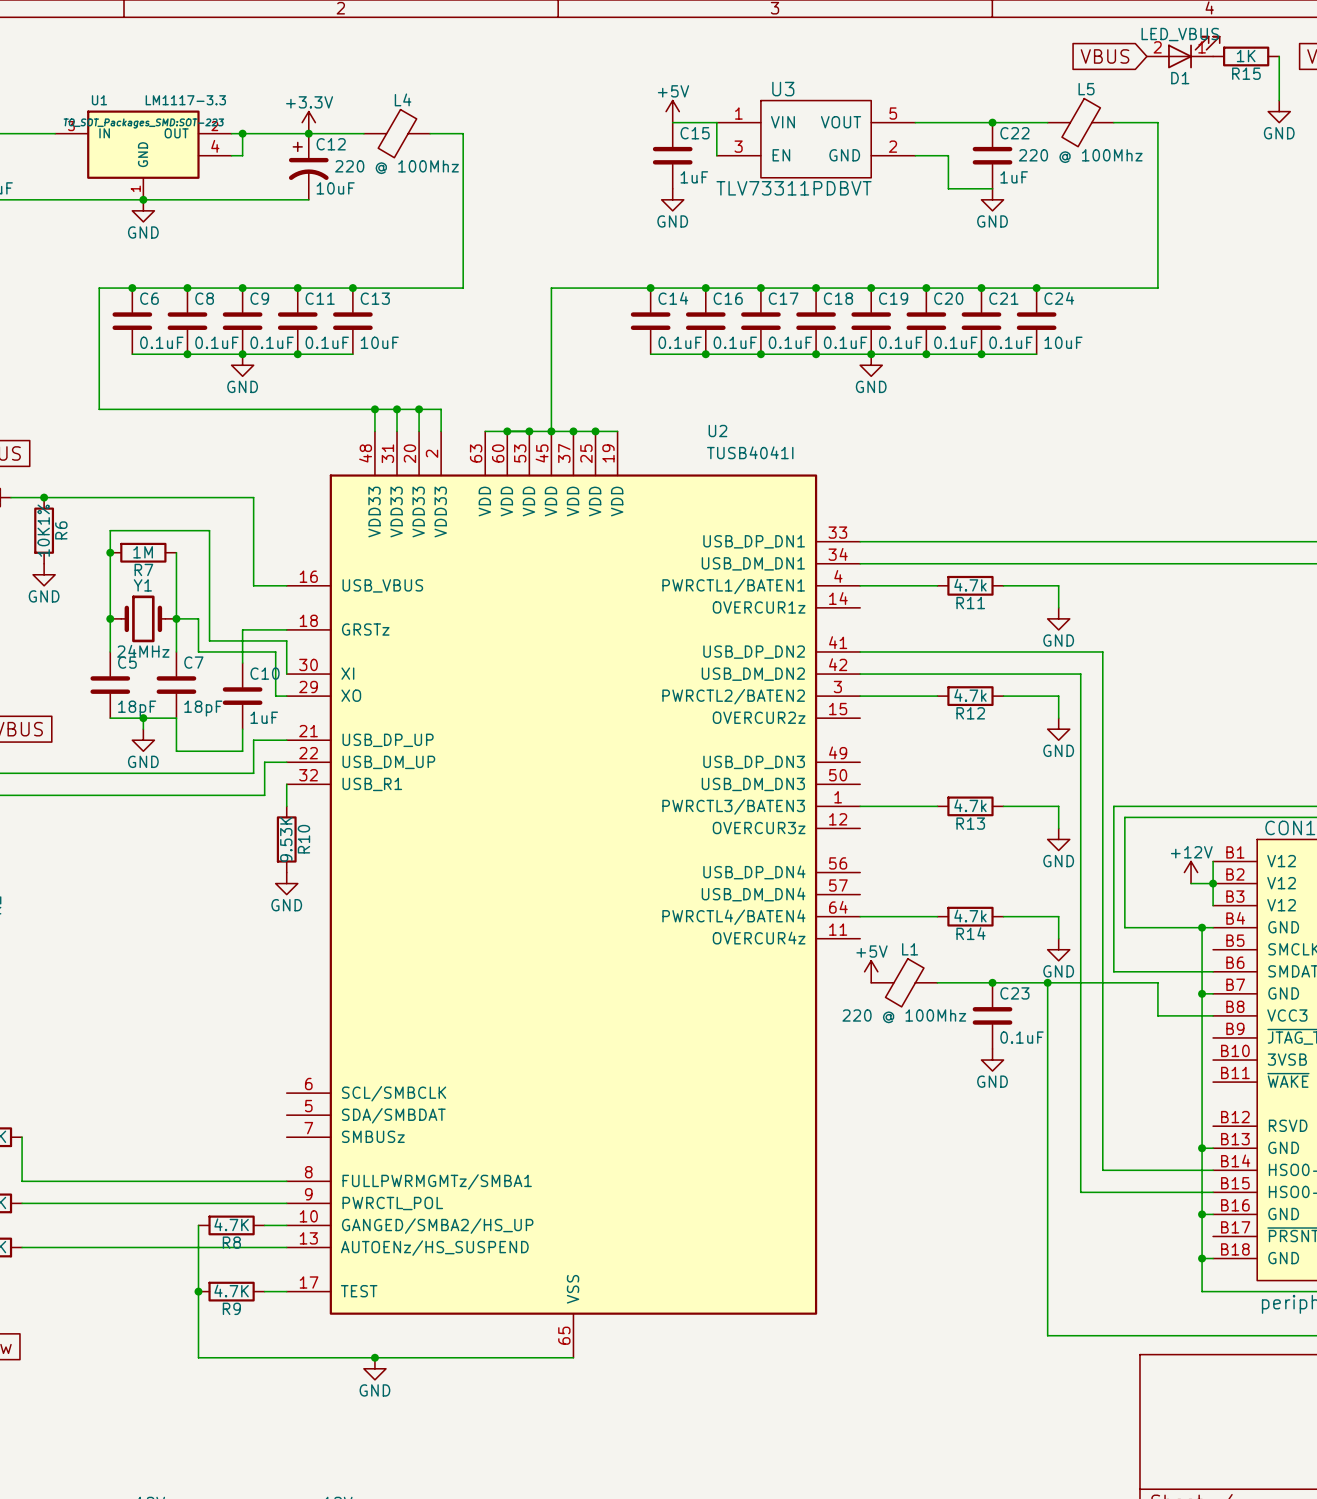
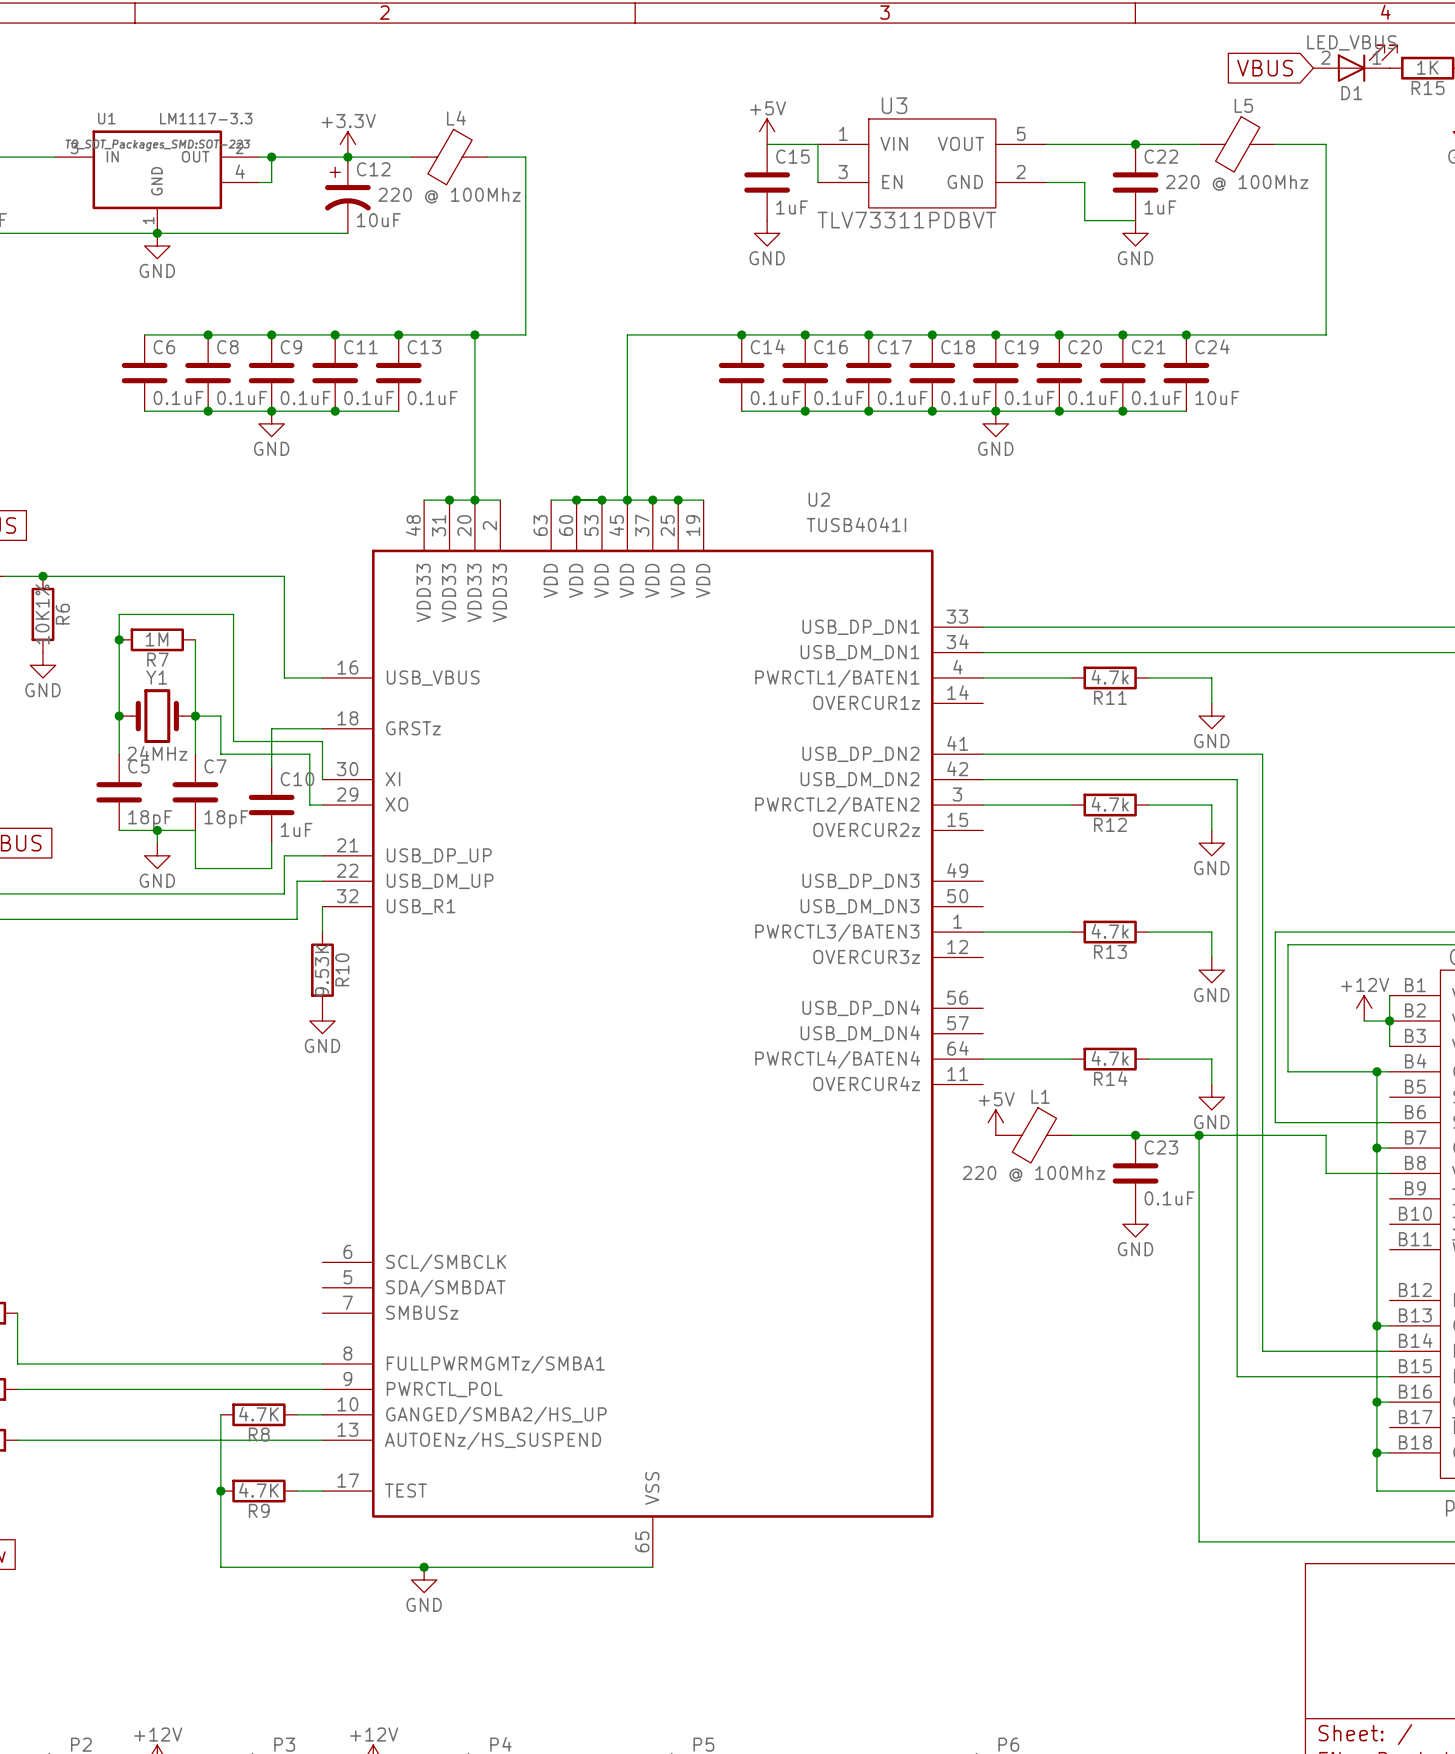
wire: (132, 288) (99, 288) (99, 409) (441, 409) (441, 431) -> none
junction: (132, 288) -> none
wire: none -> (474, 334) (474, 474)
junction: none -> (474, 334)
C13 value: 10uF (379, 342) -> 0.1uF (432, 398)
wire: (374, 409) (374, 431) -> (500, 500) (424, 500)
junction: (374, 409) -> none
wire: (397, 409) (397, 431) -> none
junction: (397, 409) -> none
junction: (419, 409) -> none
junction: none -> (449, 500)
junction: none -> (474, 500)

